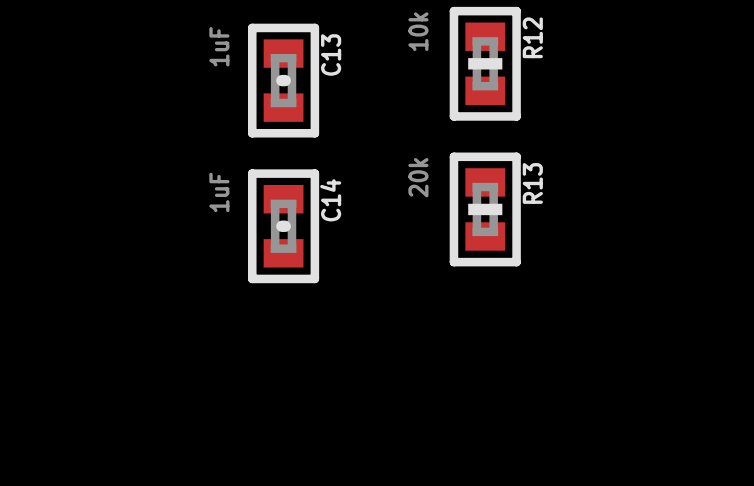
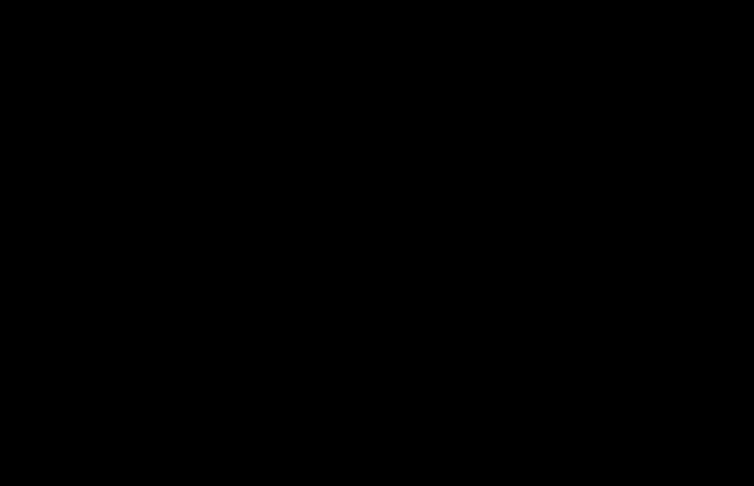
R12: 10k (485, 63) -> none
C13: 1uF (283, 80) -> none
R13: 20k (485, 209) -> none
C14: 1uF (283, 226) -> none

